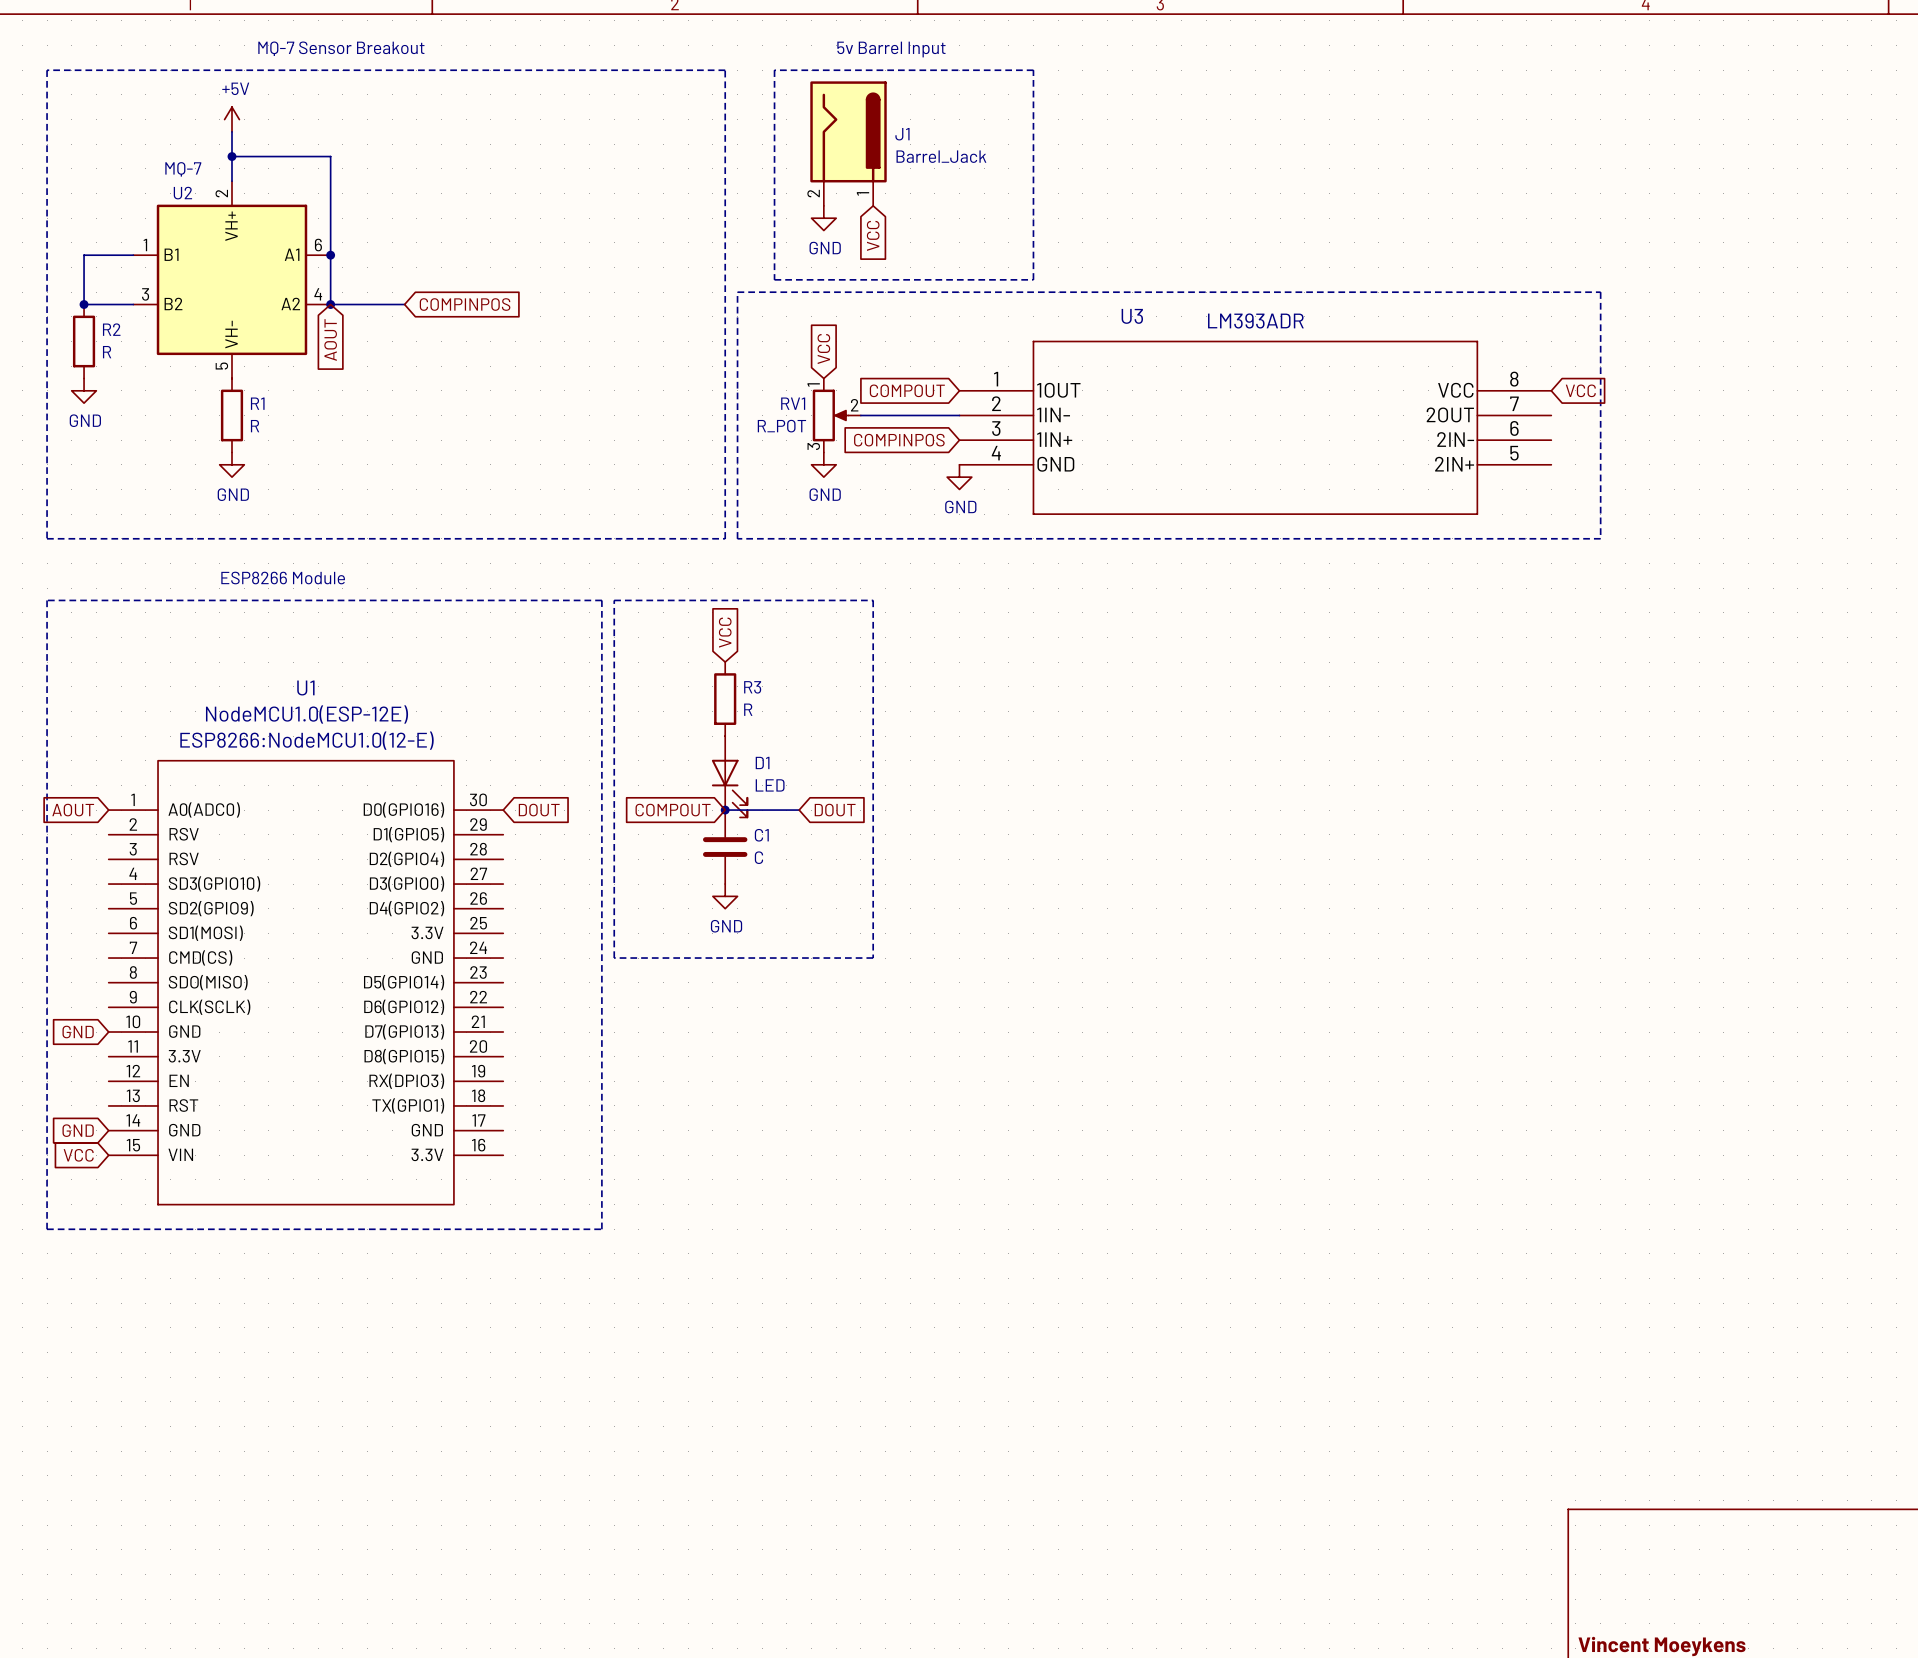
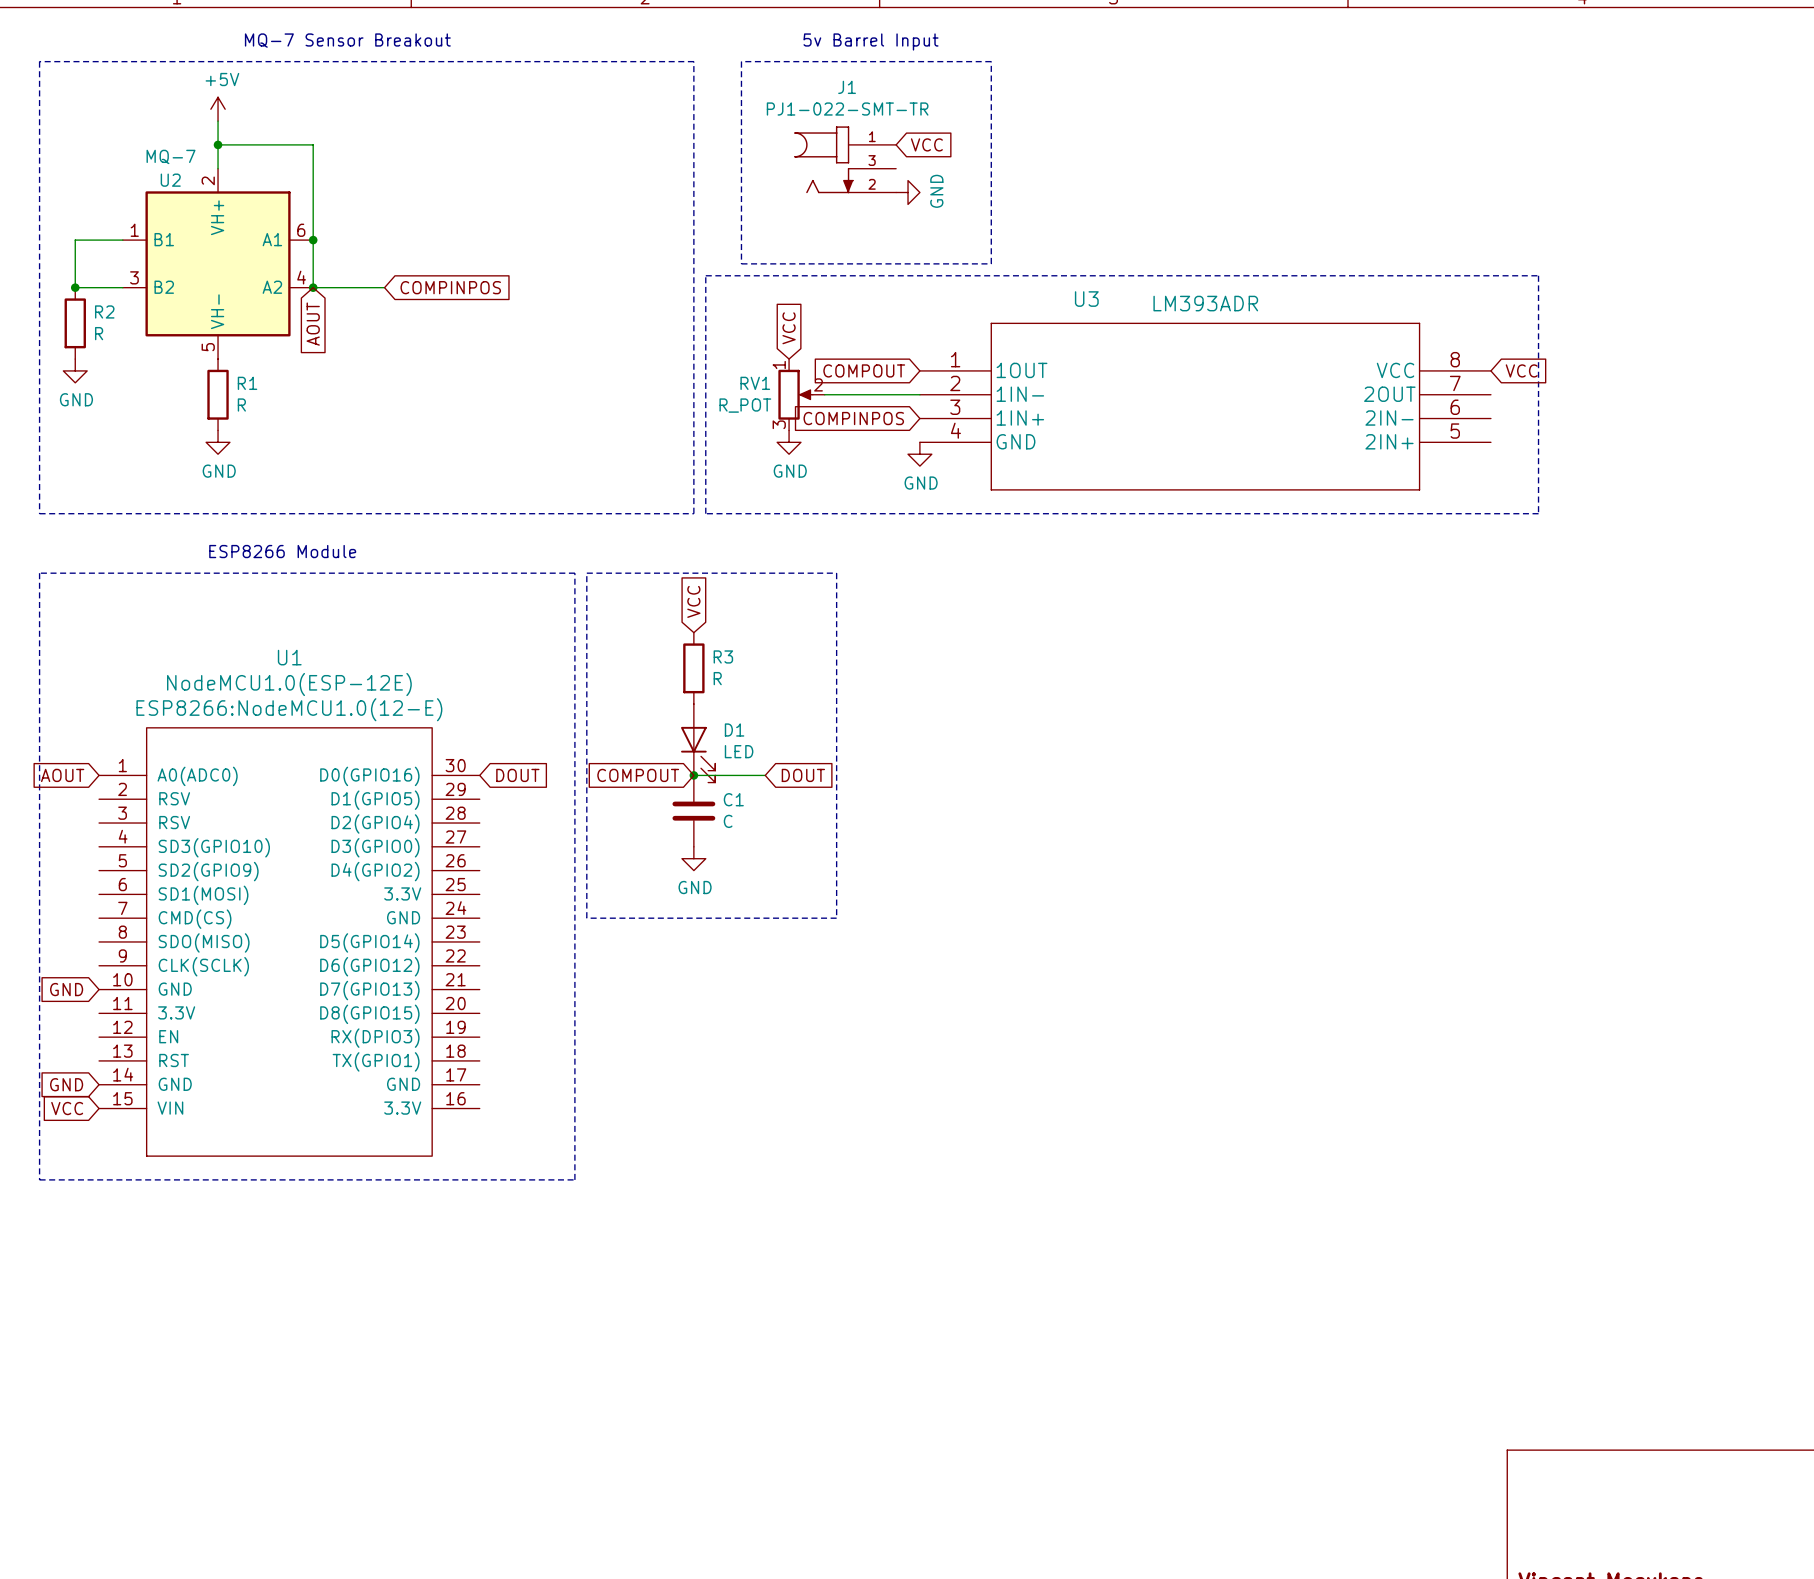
J1 symbol: [810, 81, 887, 206] -> [794, 126, 897, 194]
J1 name position: J1 (902, 134) -> J1 (847, 87)
J1 value: Barrel_Jack (941, 156) -> PJ1-022-SMT-TR (847, 109)
power symbol rotation: 0° (823, 218) -> 90° counterclockwise (908, 192)
power symbol position: GND (823, 218) -> GND (908, 192)
global label rotation: 0° (873, 235) -> 90° counterclockwise (926, 144)
global label position: VCC (873, 235) -> VCC (926, 144)

